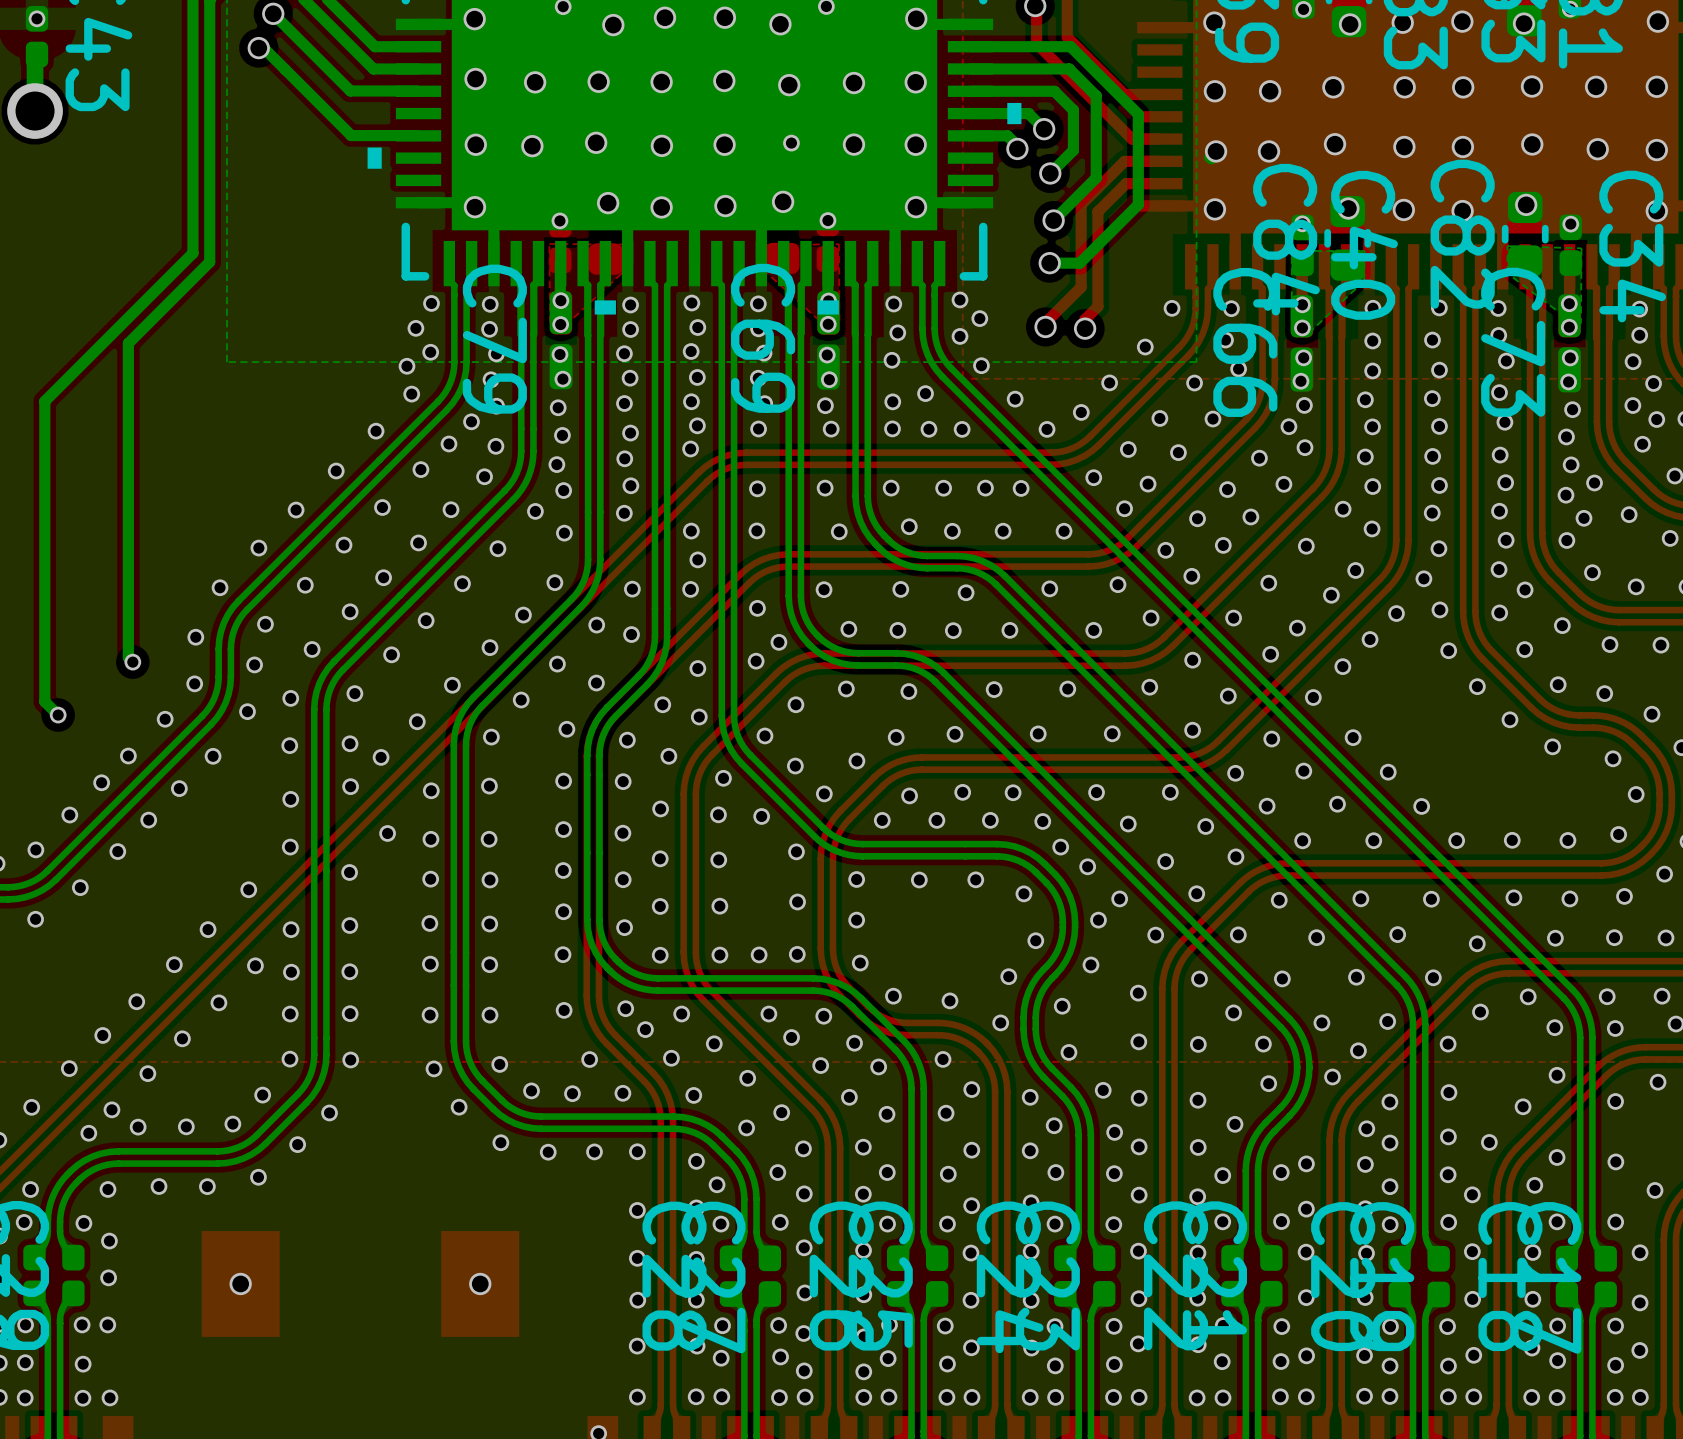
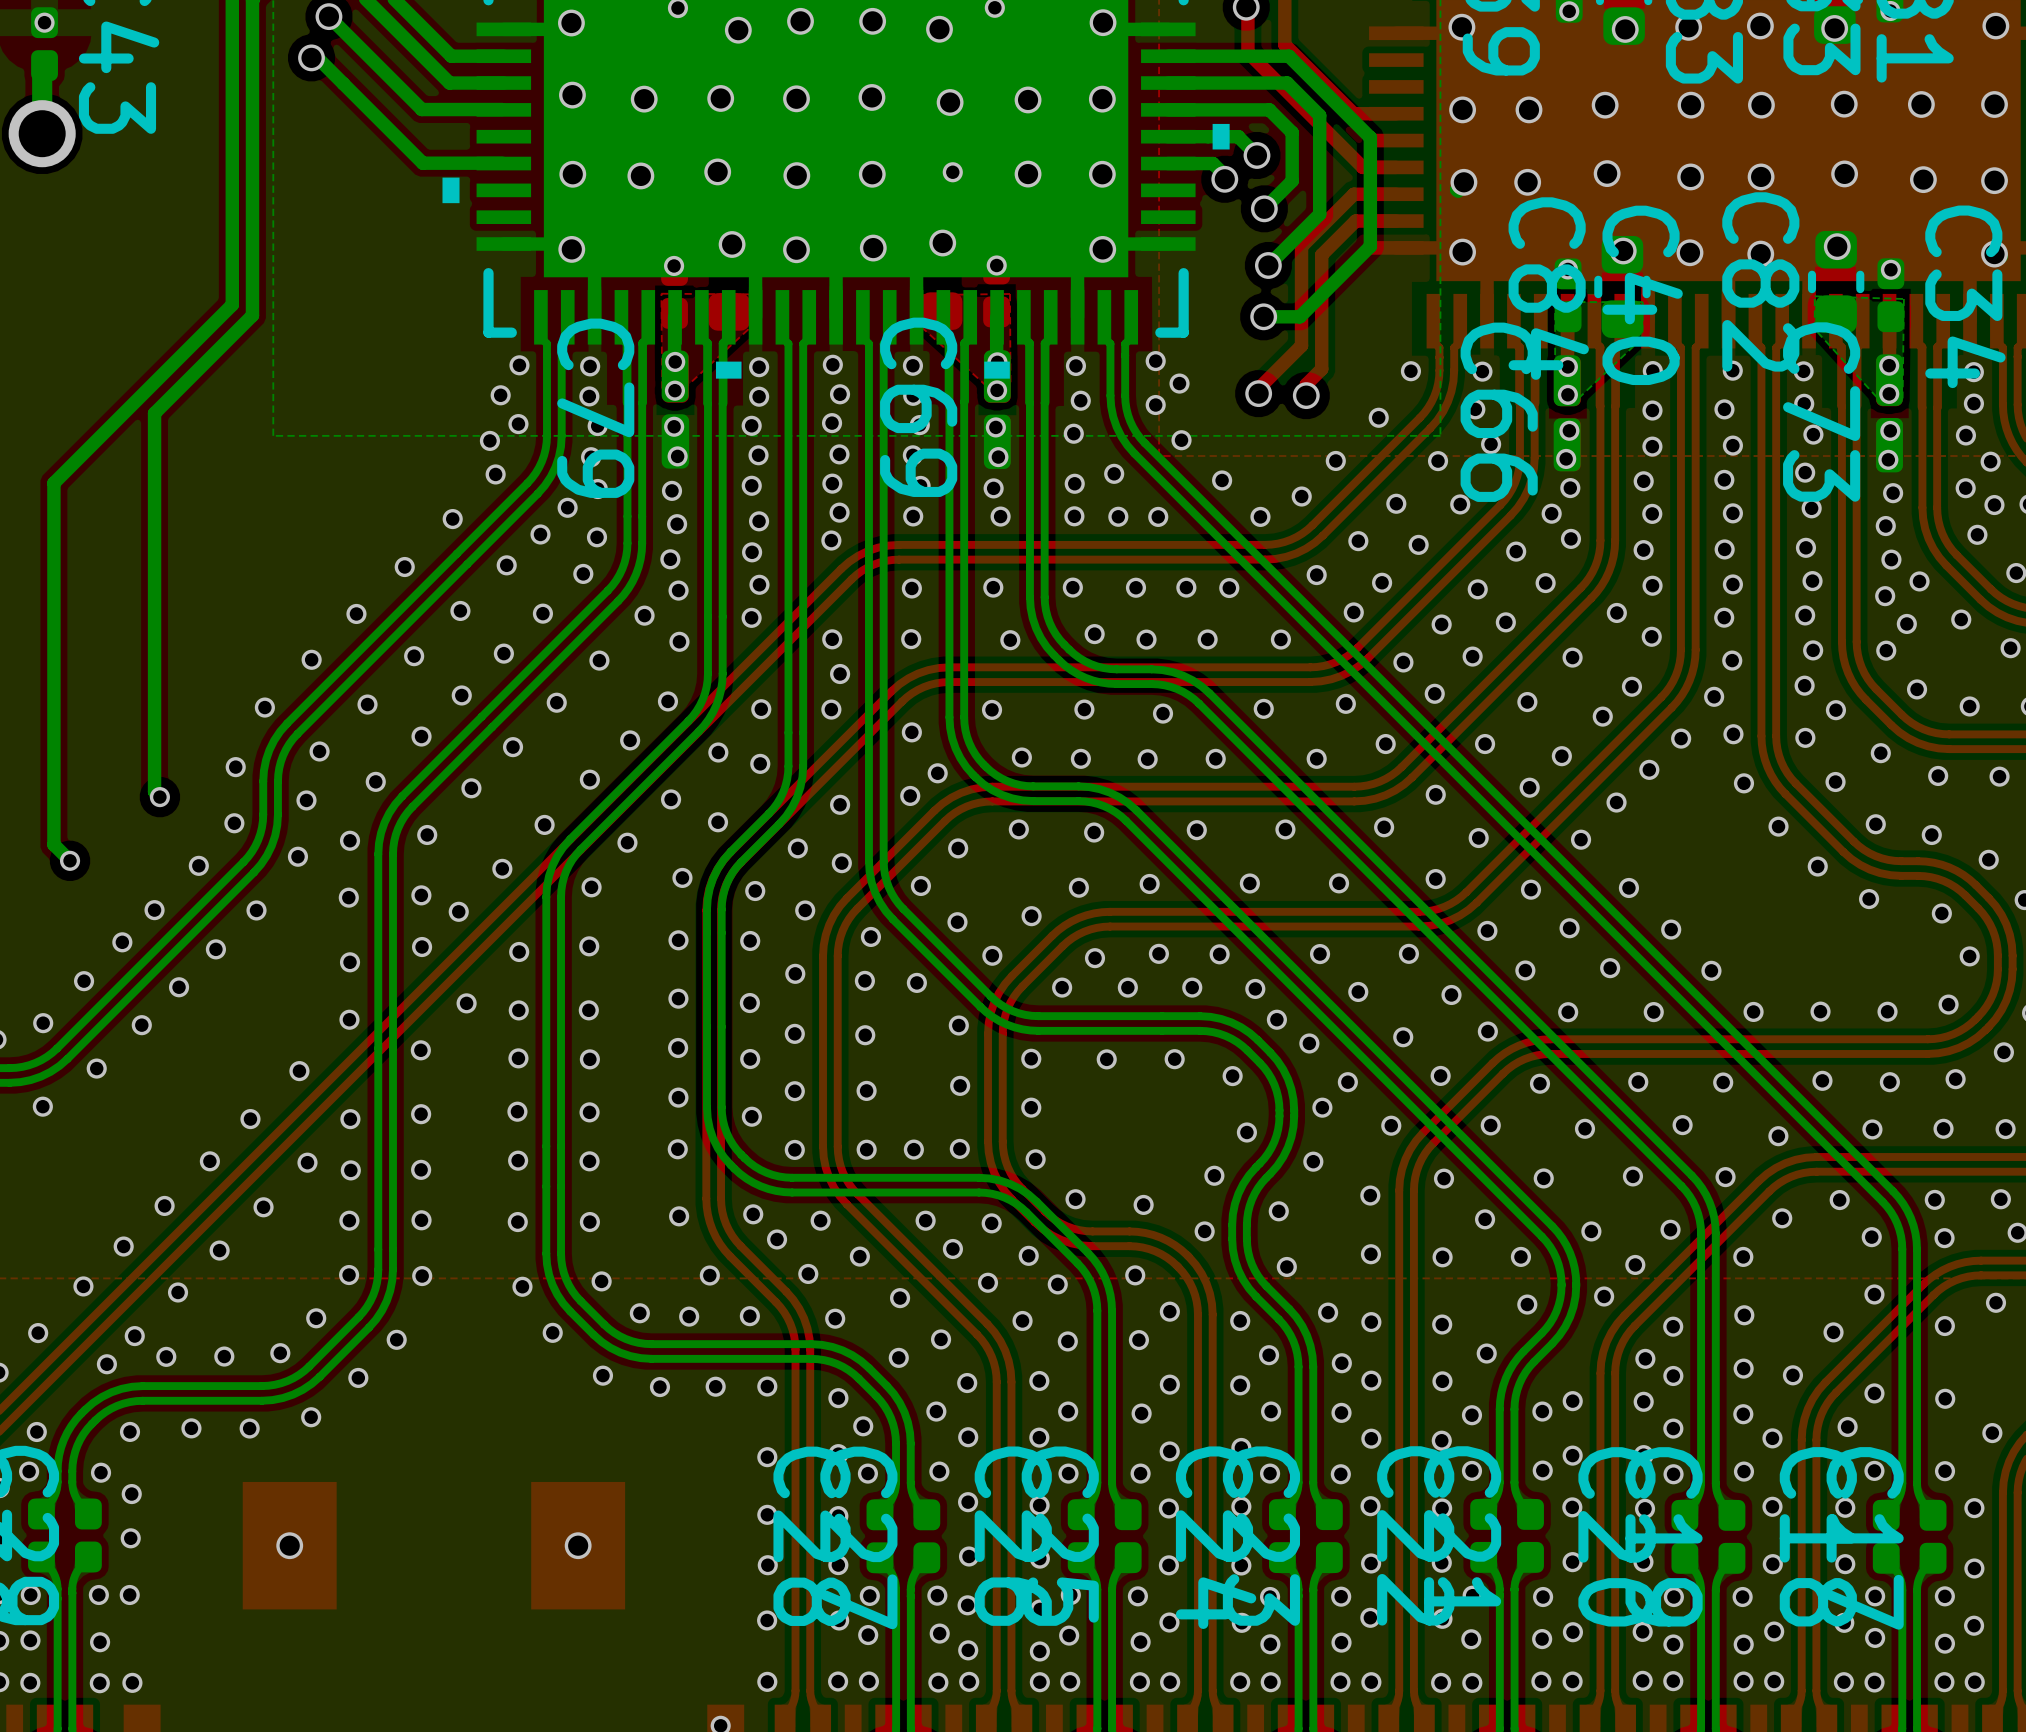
bottom zone outline: (1581, 248) (1580, 323) (1574, 323) (1507, 273) -> (1903, 298) (1902, 398) (1876, 397) (1814, 329)

